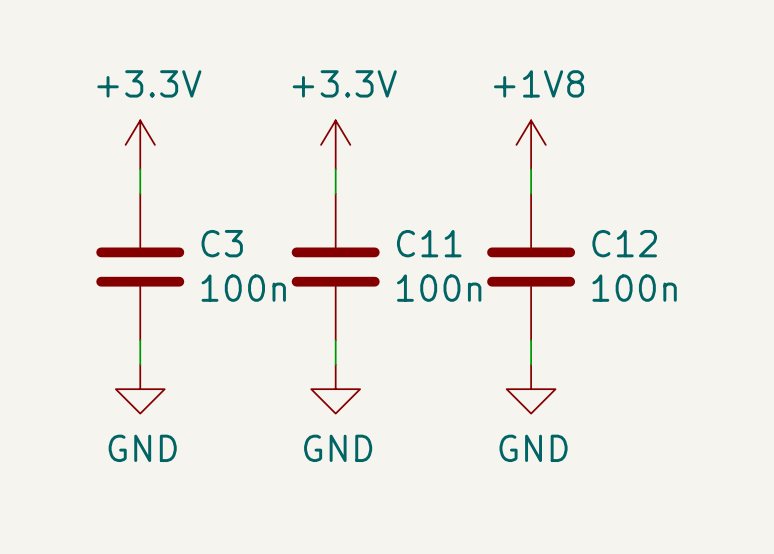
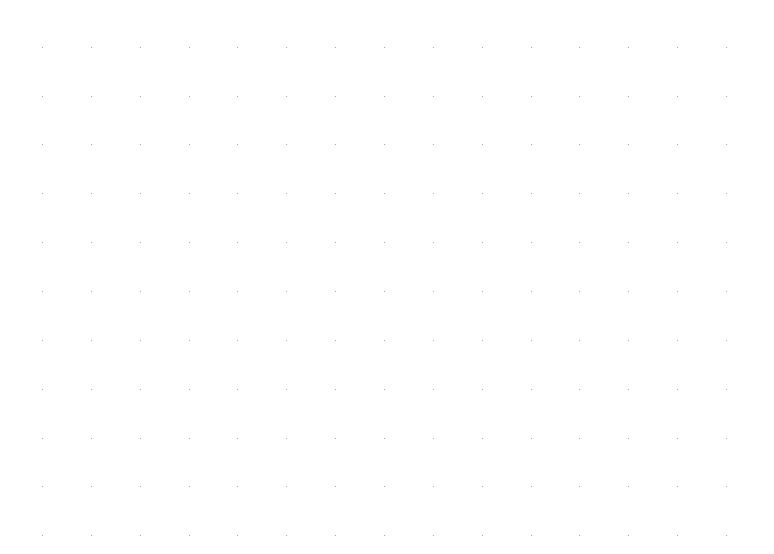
power symbol: +3.3V (140, 144) -> none
power symbol: +3.3V (335, 144) -> none
power symbol: +1V8 (531, 144) -> none
wire: (140, 169) (140, 193) -> none
wire: (335, 169) (335, 193) -> none
wire: (531, 169) (531, 193) -> none
C3: 100n (140, 267) -> none
C11: 100n (335, 267) -> none
C12: 100n (531, 267) -> none
wire: (140, 340) (140, 364) -> none
wire: (335, 340) (335, 364) -> none
wire: (531, 340) (531, 364) -> none
power symbol: GND (140, 389) -> none
power symbol: GND (335, 389) -> none
power symbol: GND (531, 389) -> none

